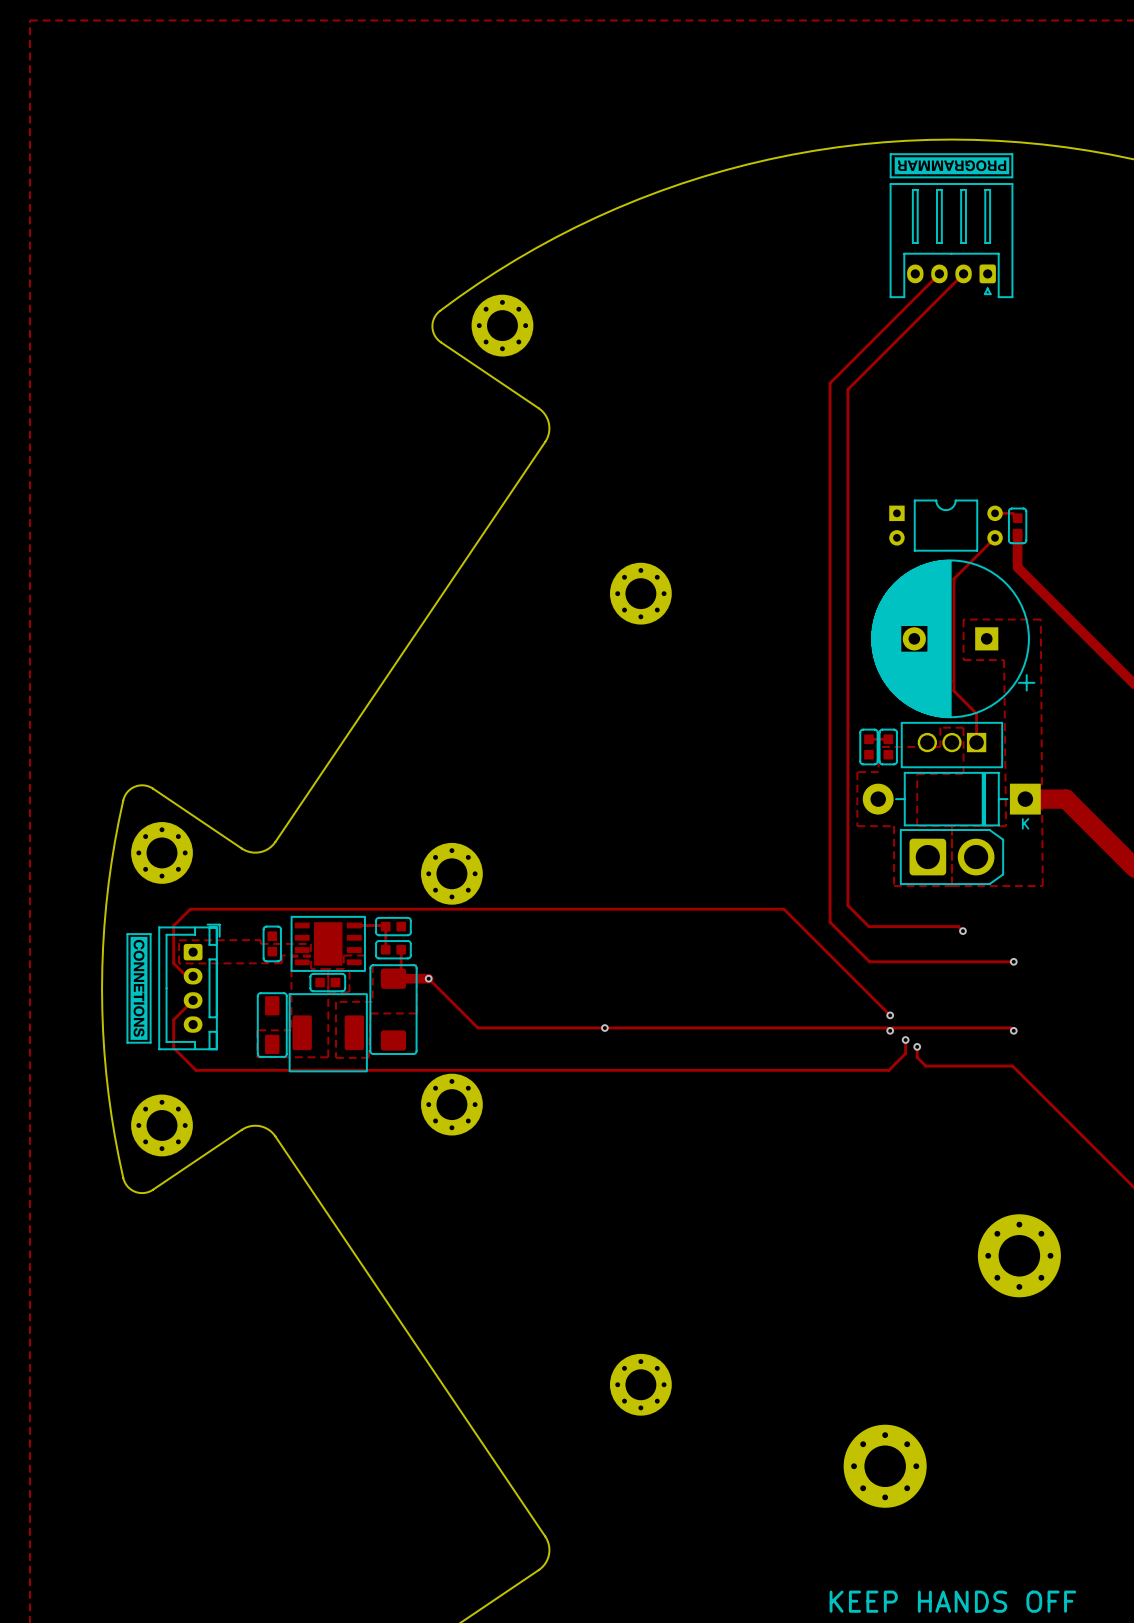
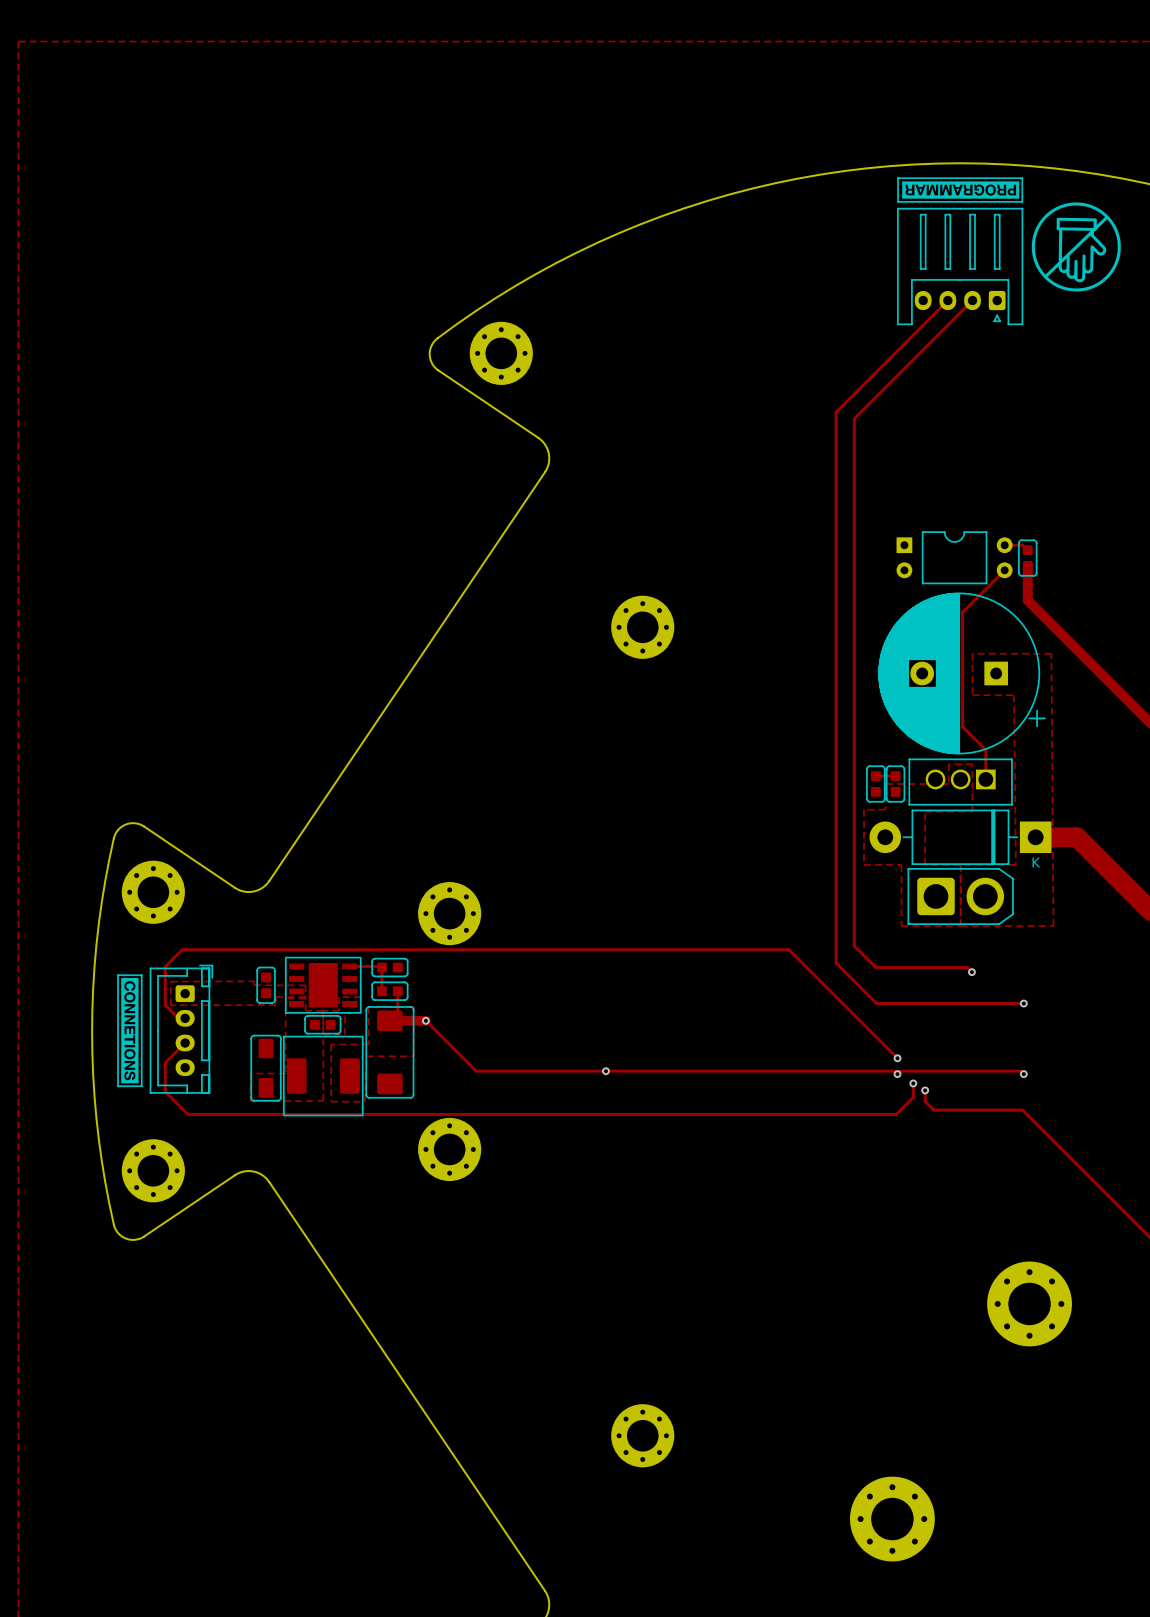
drawing: none -> [1031, 202, 1121, 292]

